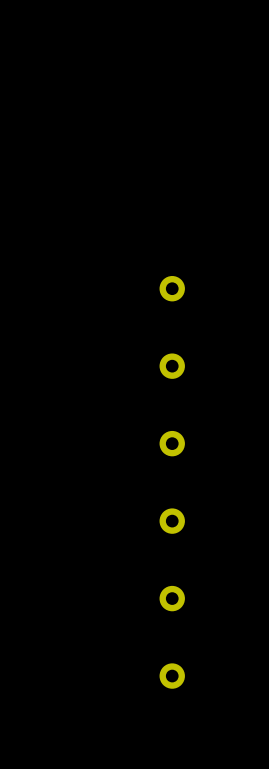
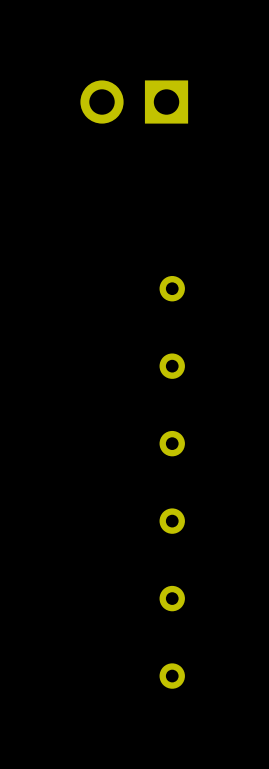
part: none -> (134, 102)

